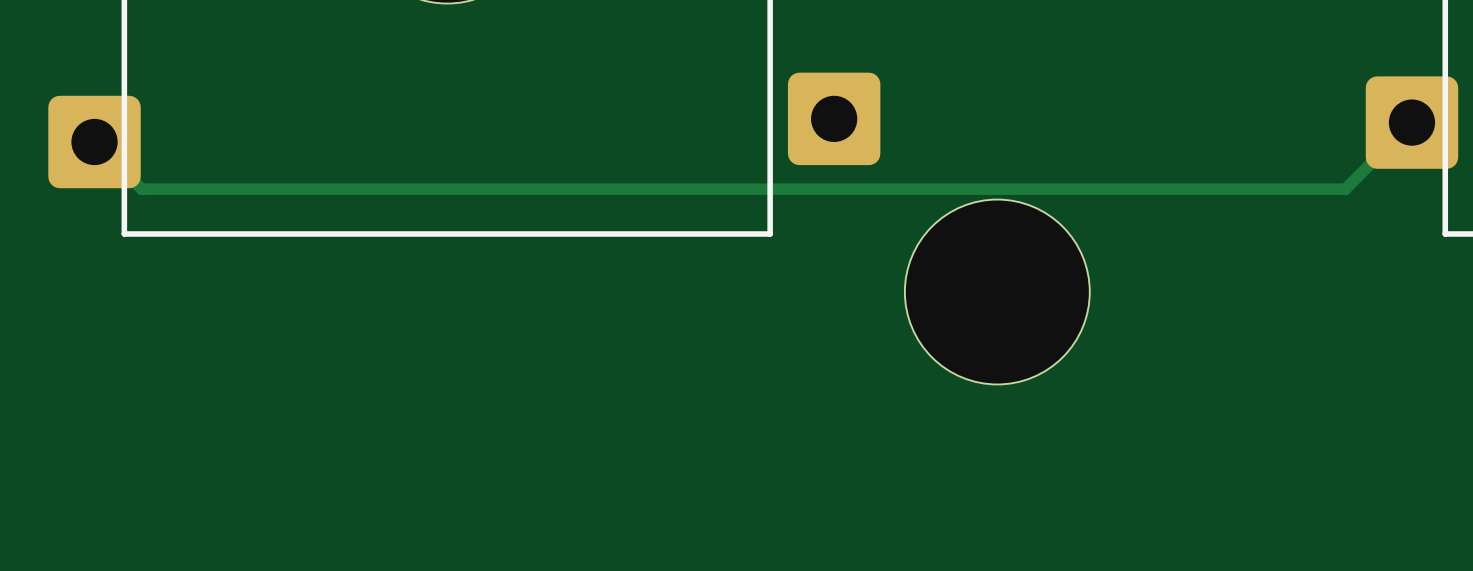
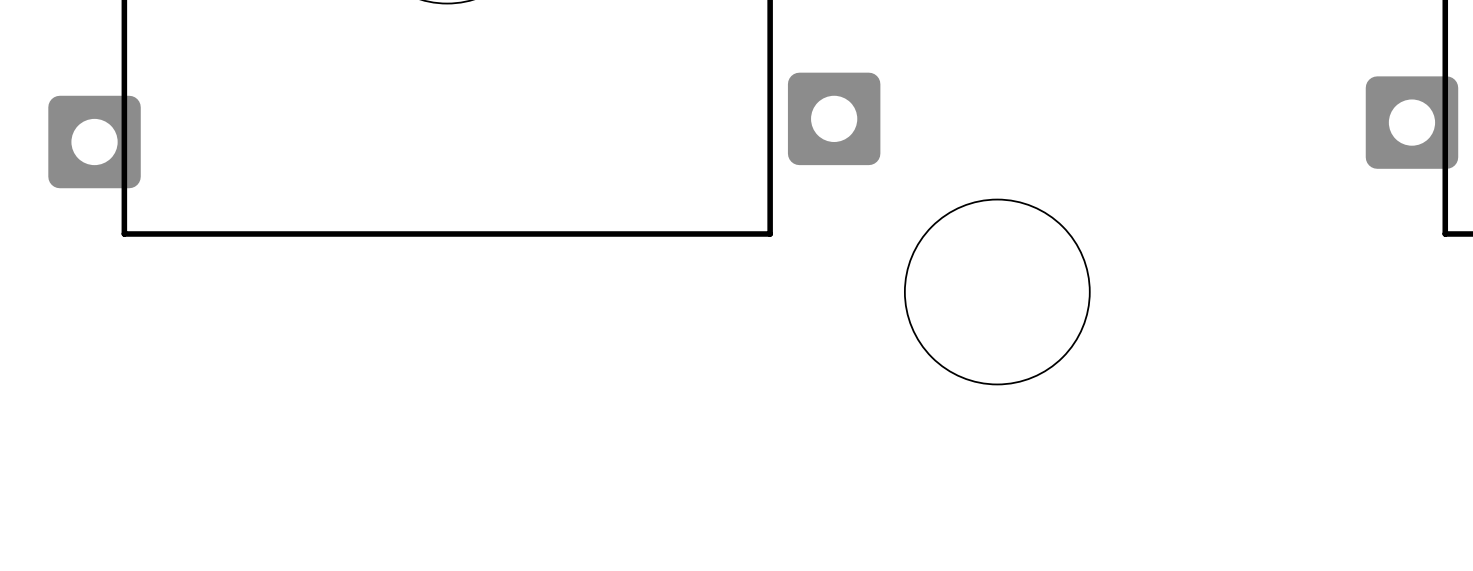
track: (1411, 122) (1345, 189) (141, 189) (94, 142) -> none

